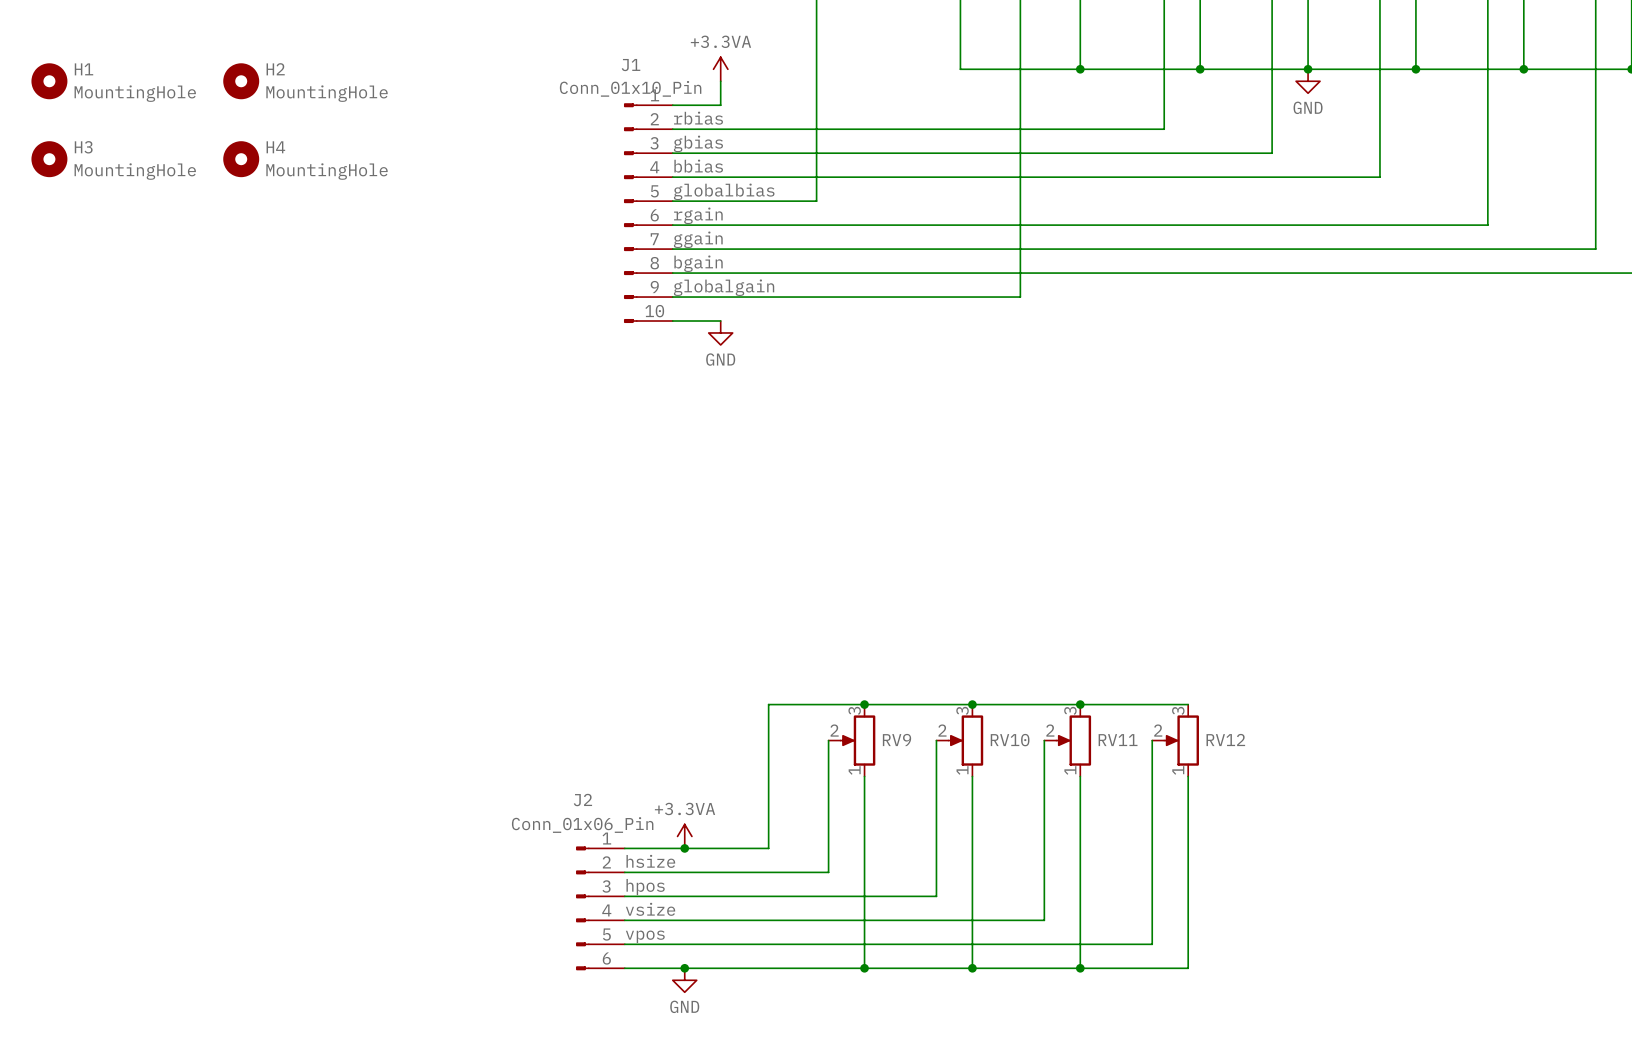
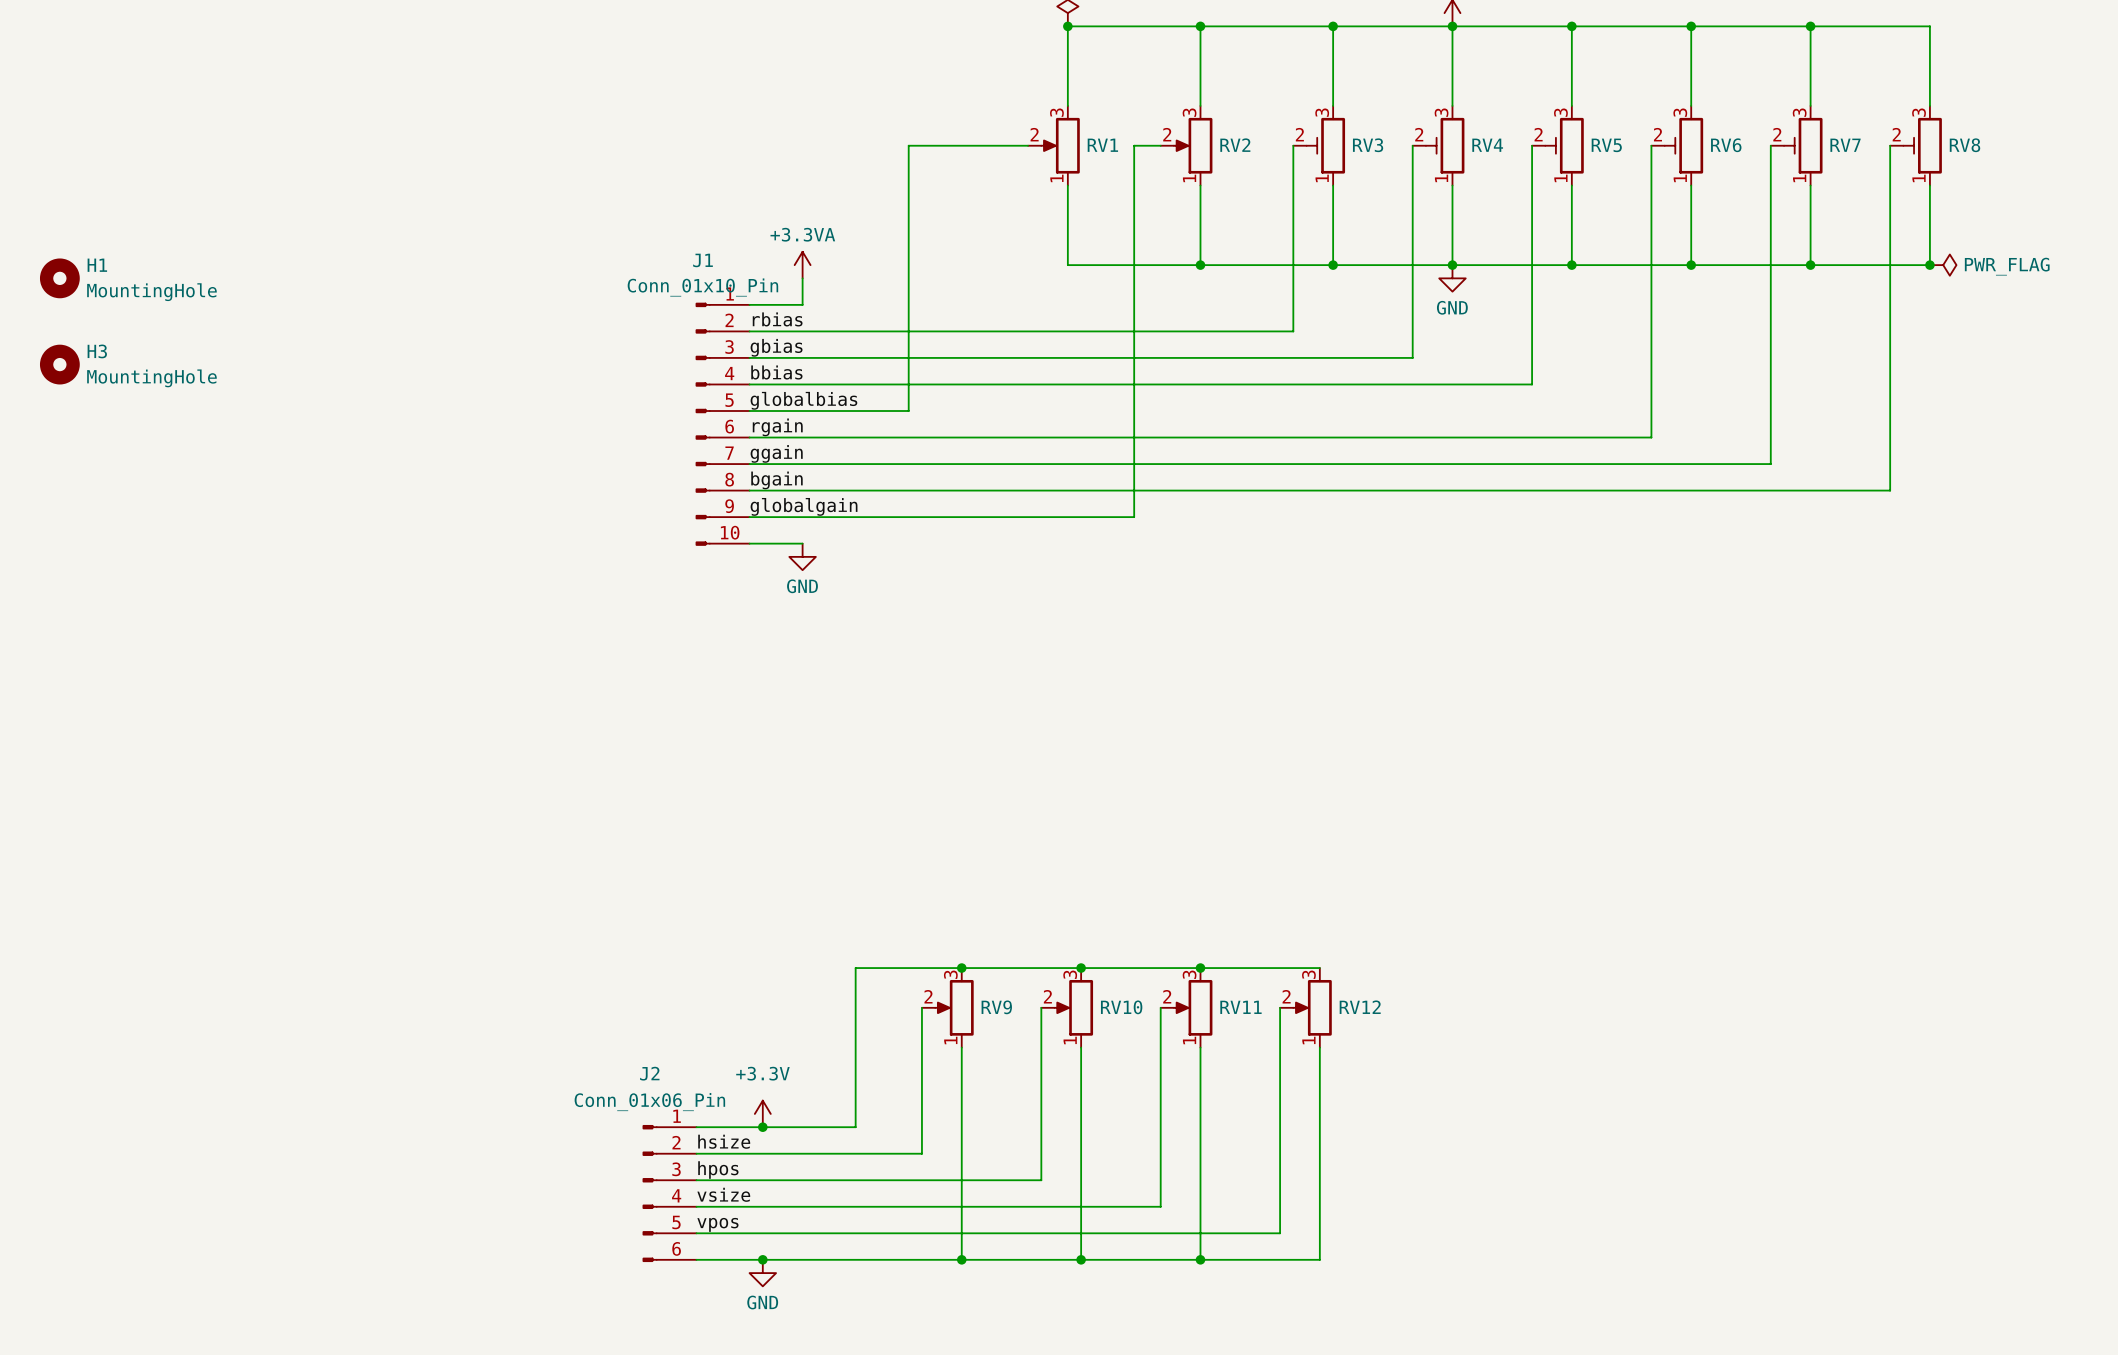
H2: MountingHole (241, 81) -> none
H4: MountingHole (241, 159) -> none
power symbol: +3.3VA (684, 836) -> +3.3V (762, 1113)

